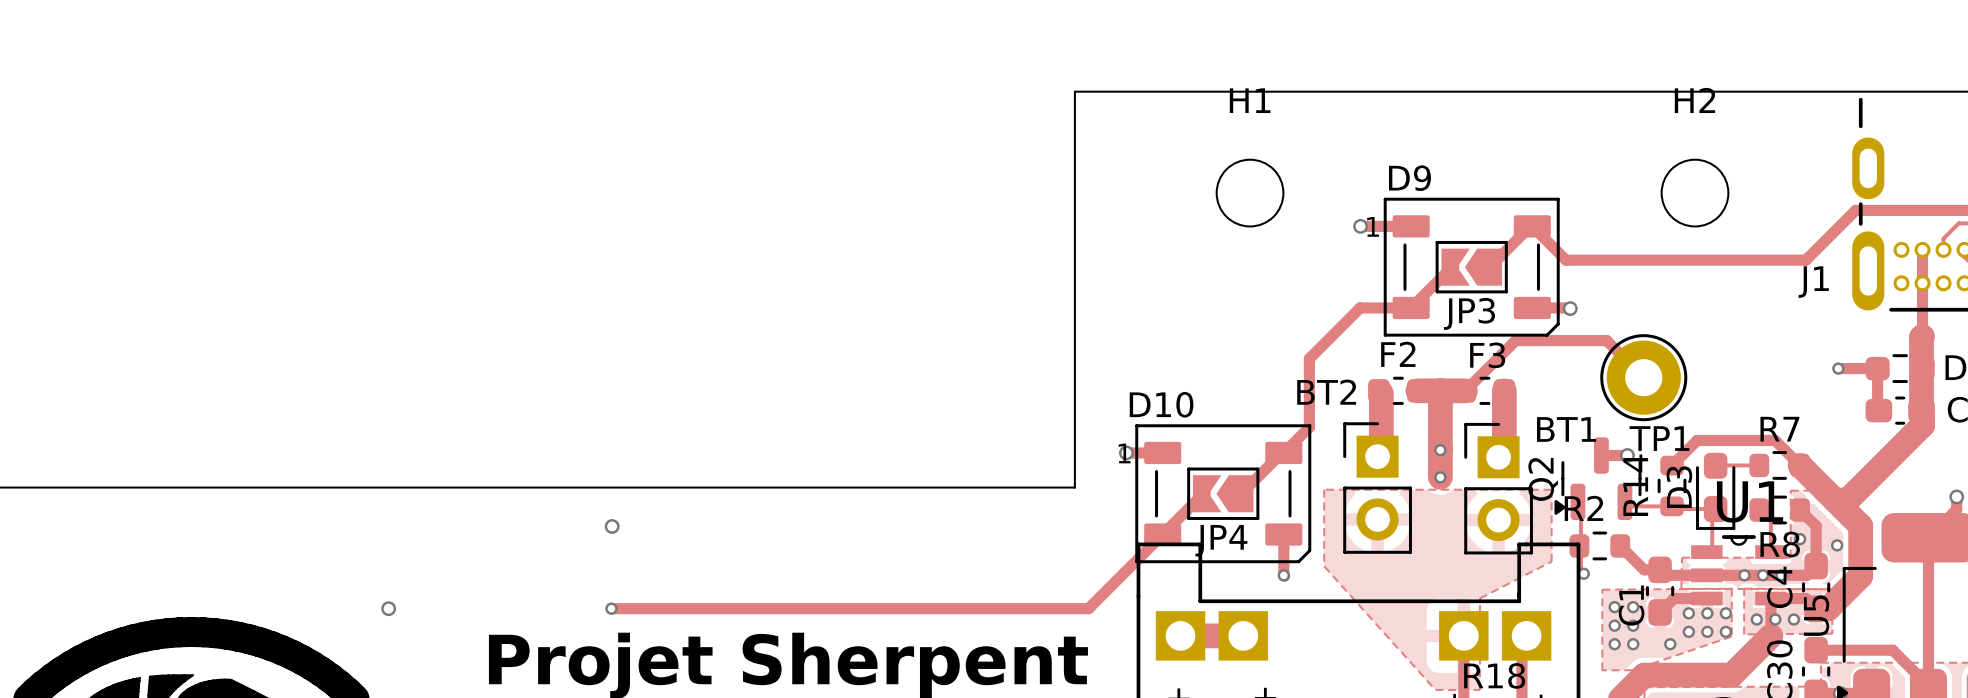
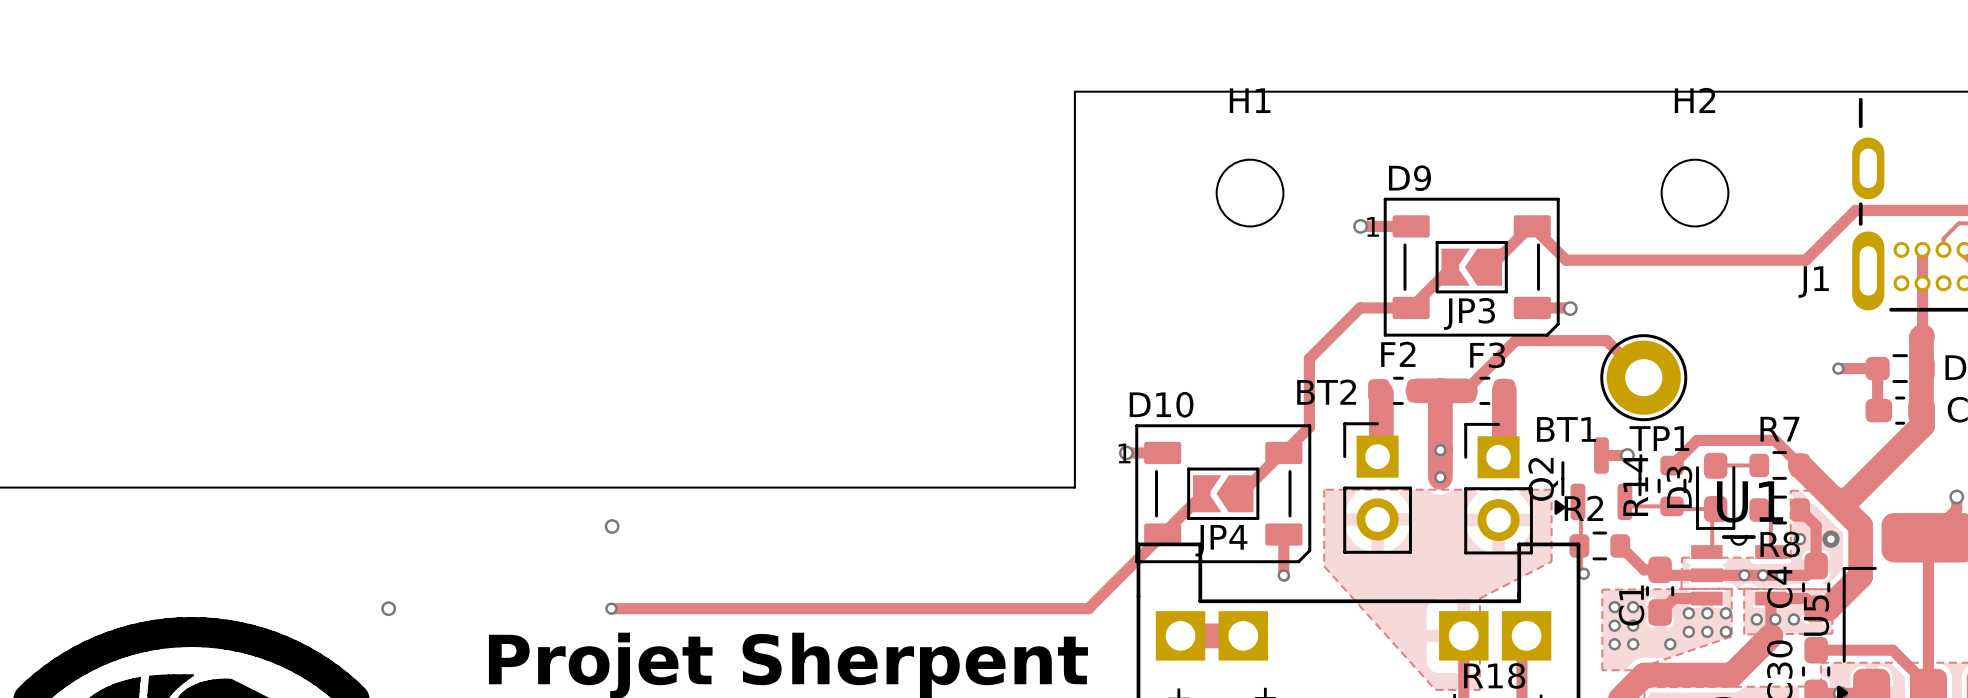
via size: [1830, 539, 1844, 552] -> [1822, 530, 1840, 548]

